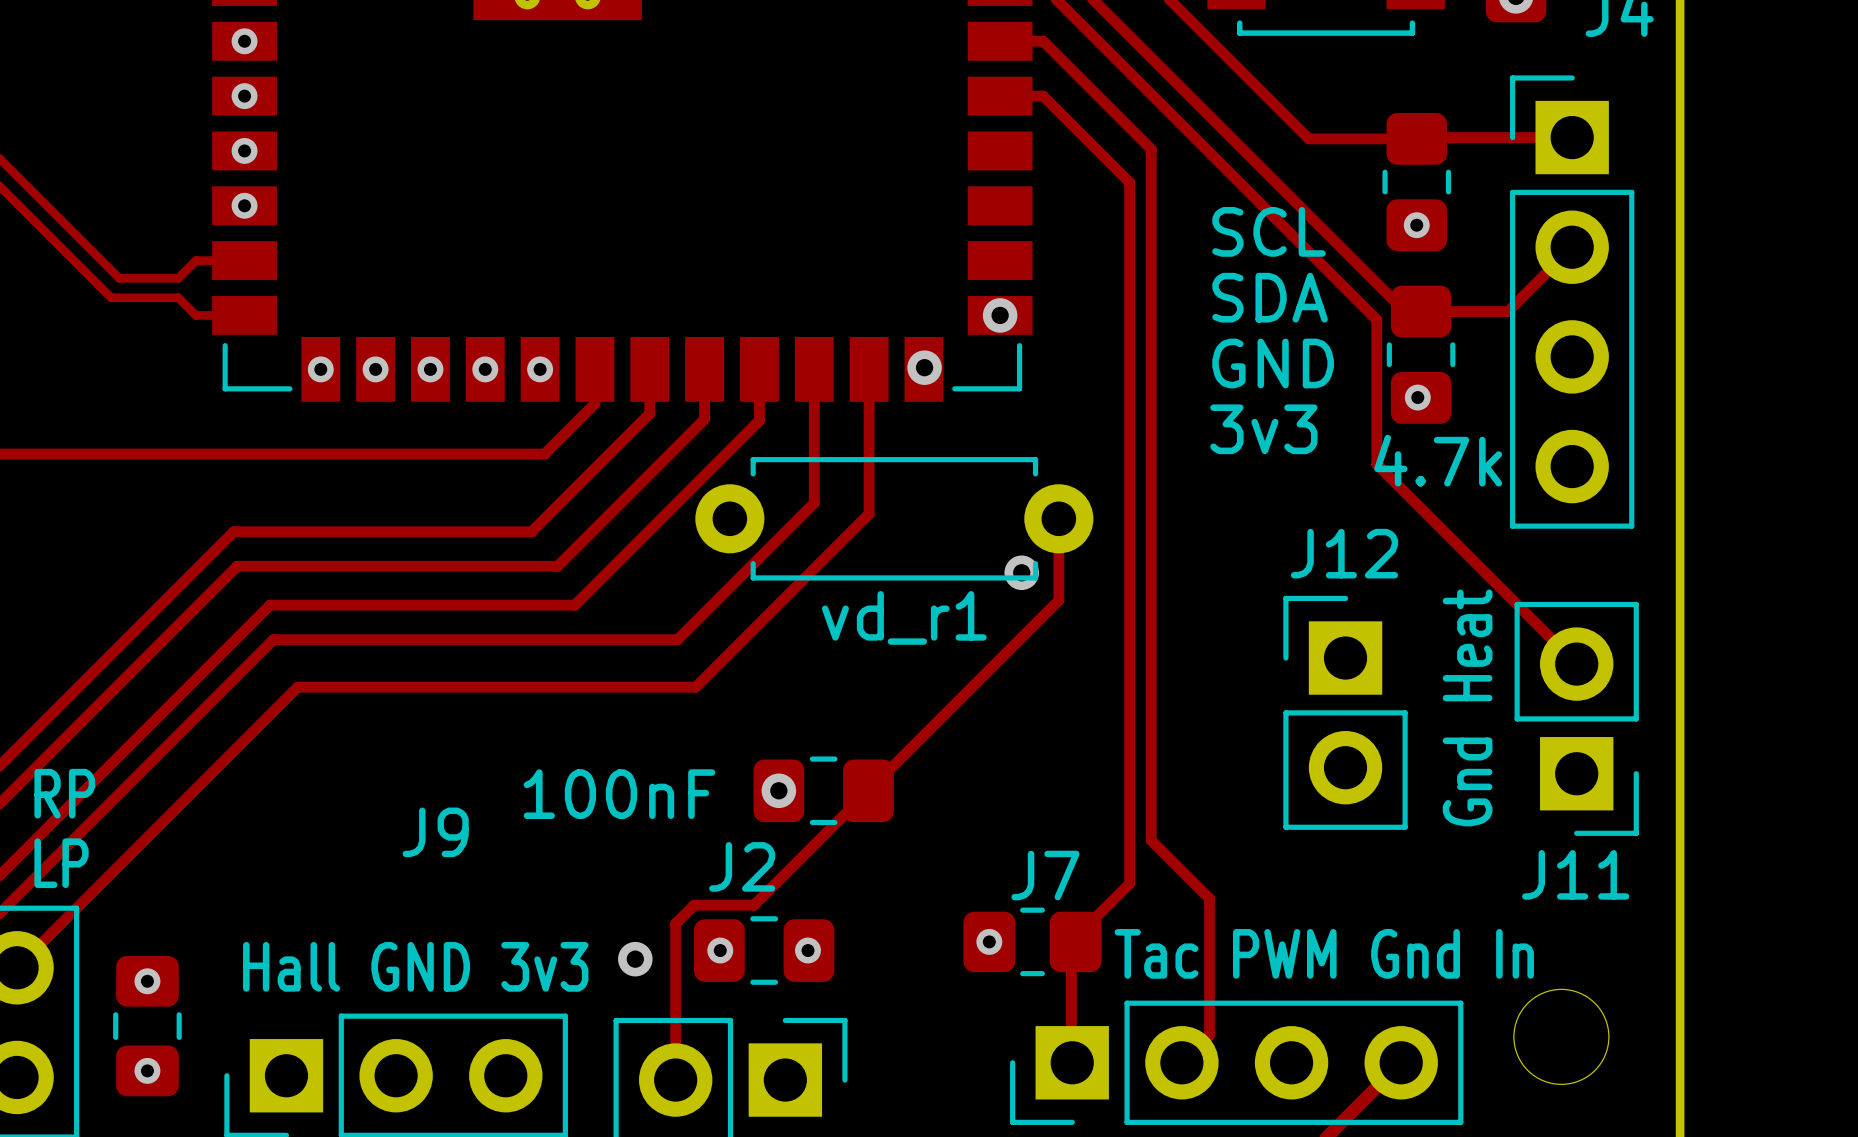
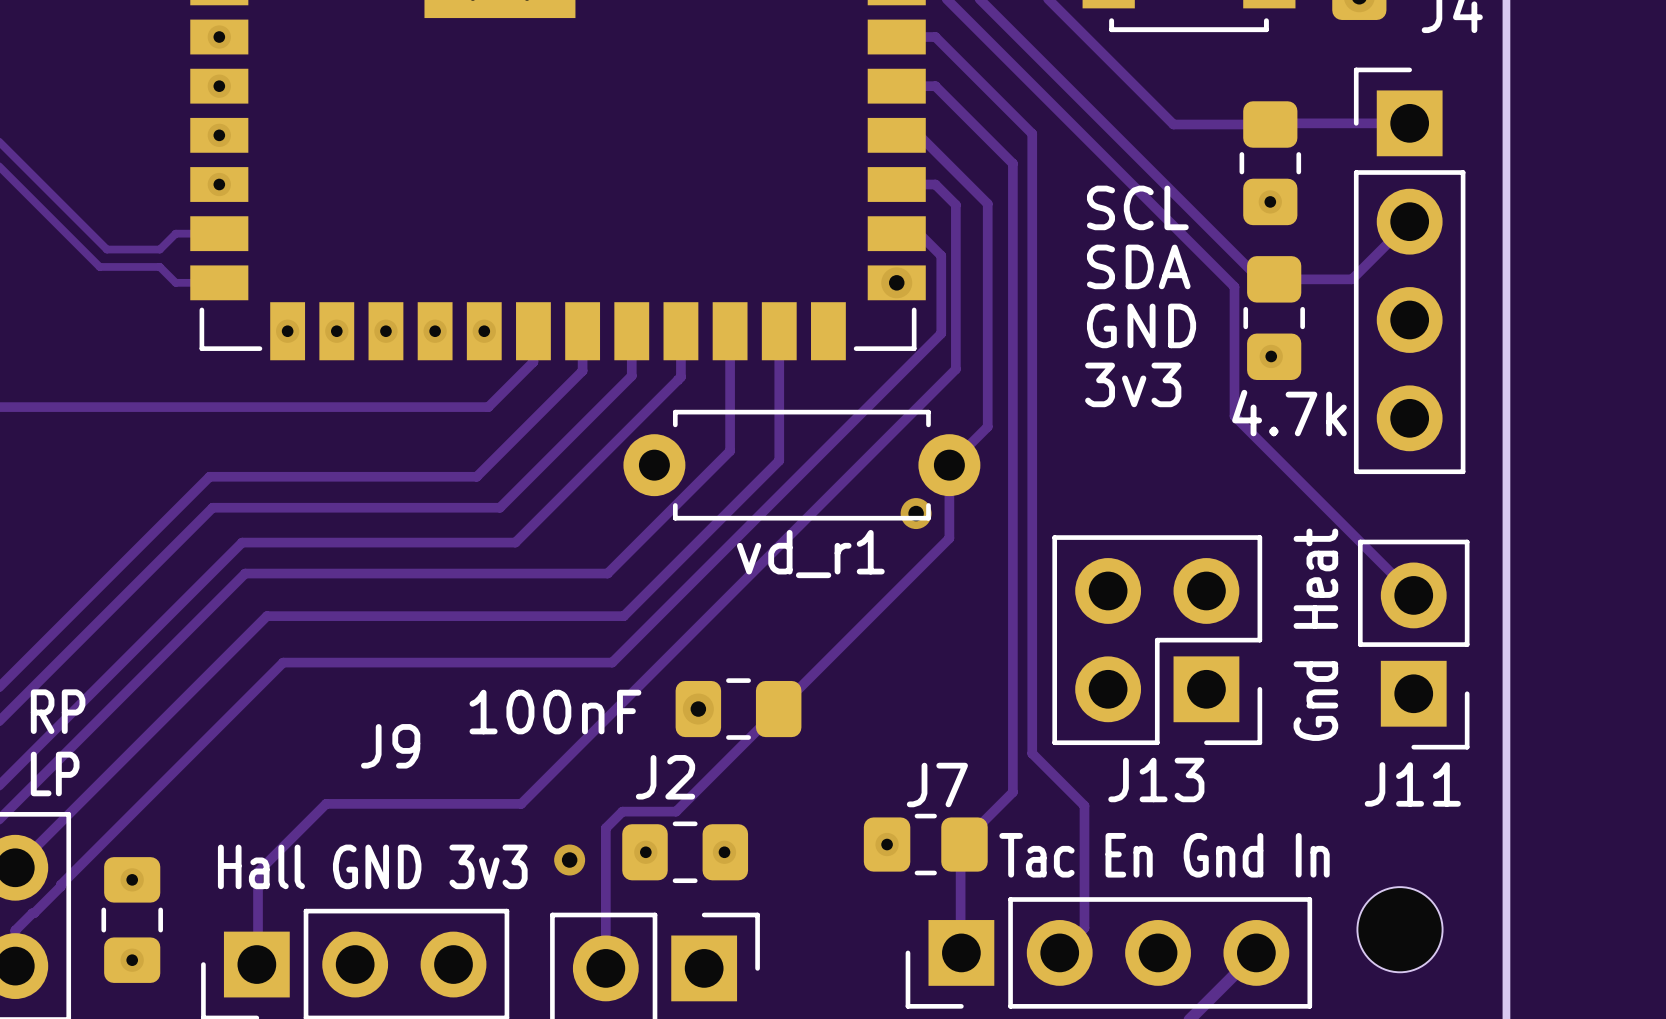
track: none -> (896, 135) (919, 135) (987, 203) (987, 426) (949, 465)
track: none -> (896, 184) (935, 184) (955, 204) (955, 369) (521, 803) (326, 803) (258, 872) (256, 964)
track: none -> (896, 233) (919, 233) (941, 255) (941, 333) (612, 662) (283, 662) (15, 930) (15, 966)
via: (924, 367) -> none
J12: (1345, 712) -> none
J13: none -> (1157, 640)
text: Tac PWM Gnd In (1324, 953) -> Tac En Gnd In (1164, 855)

